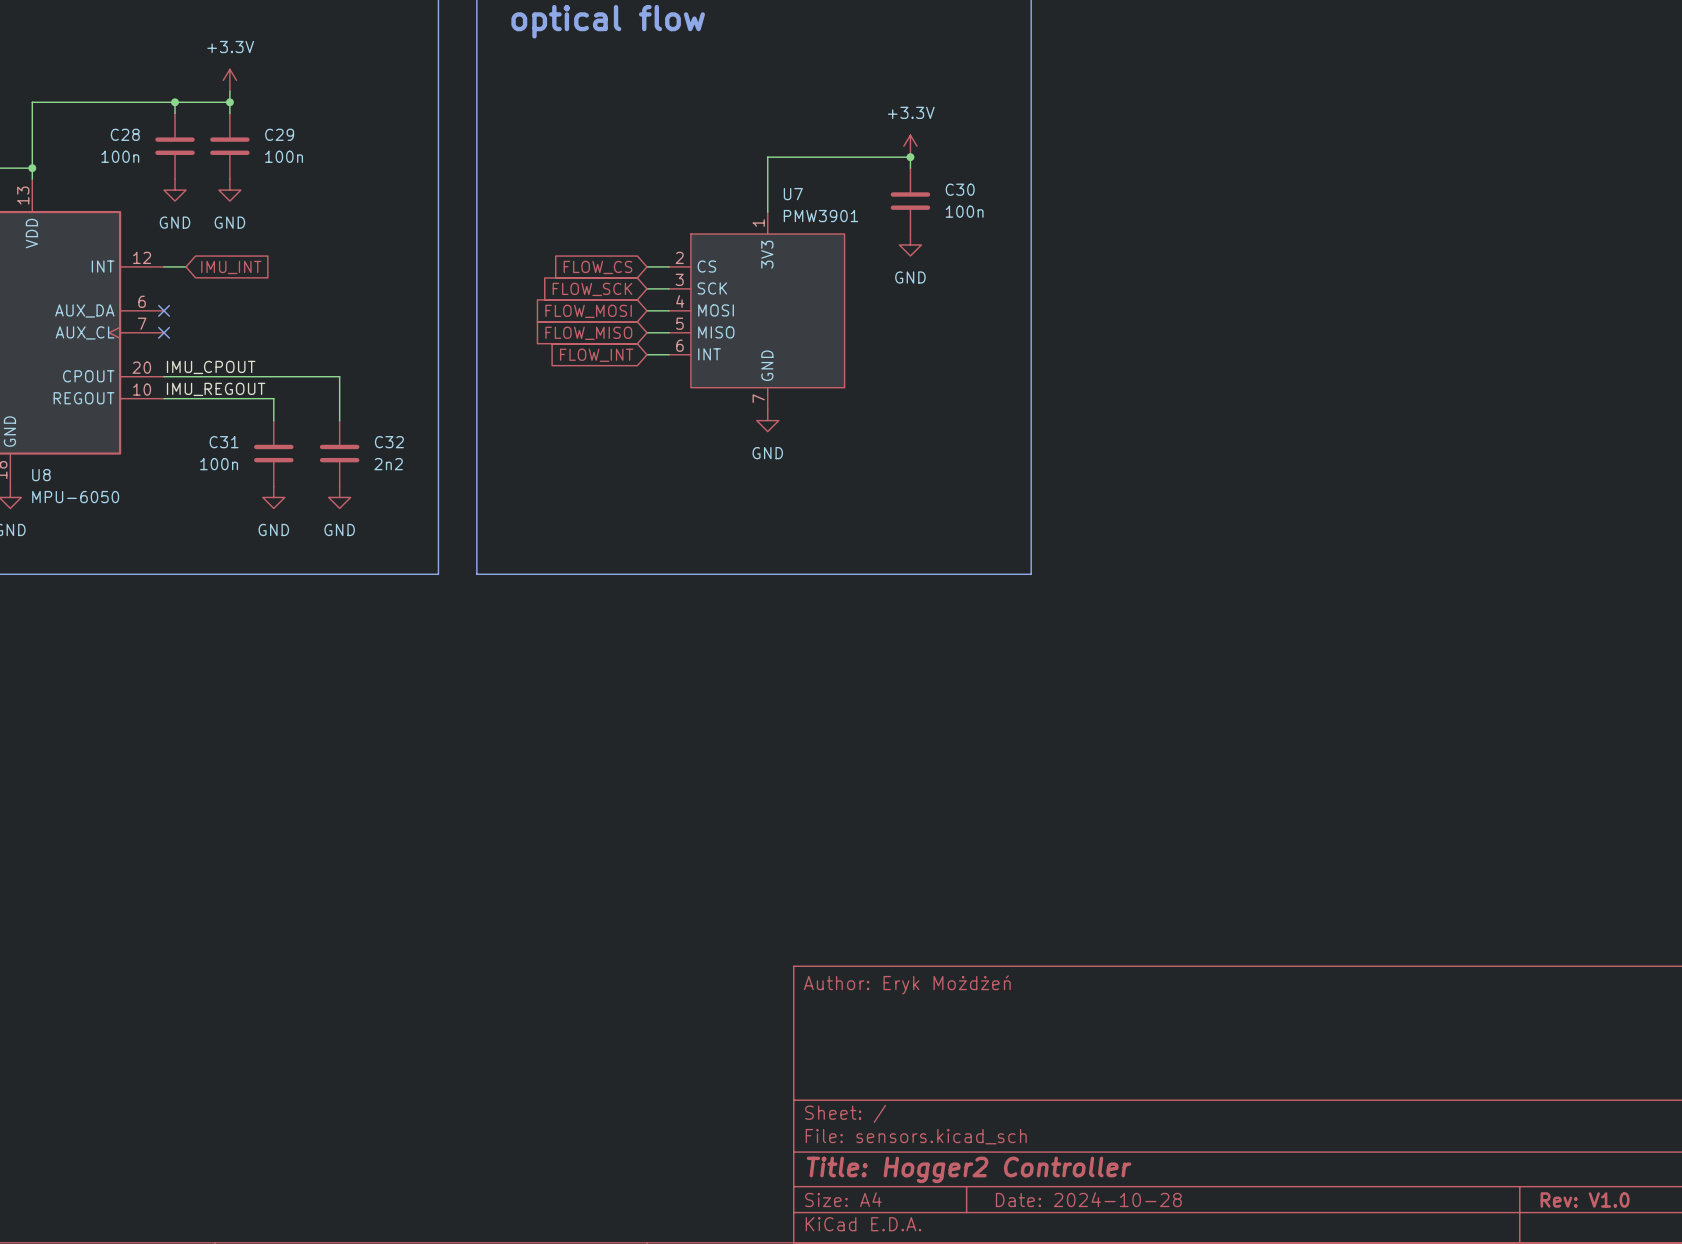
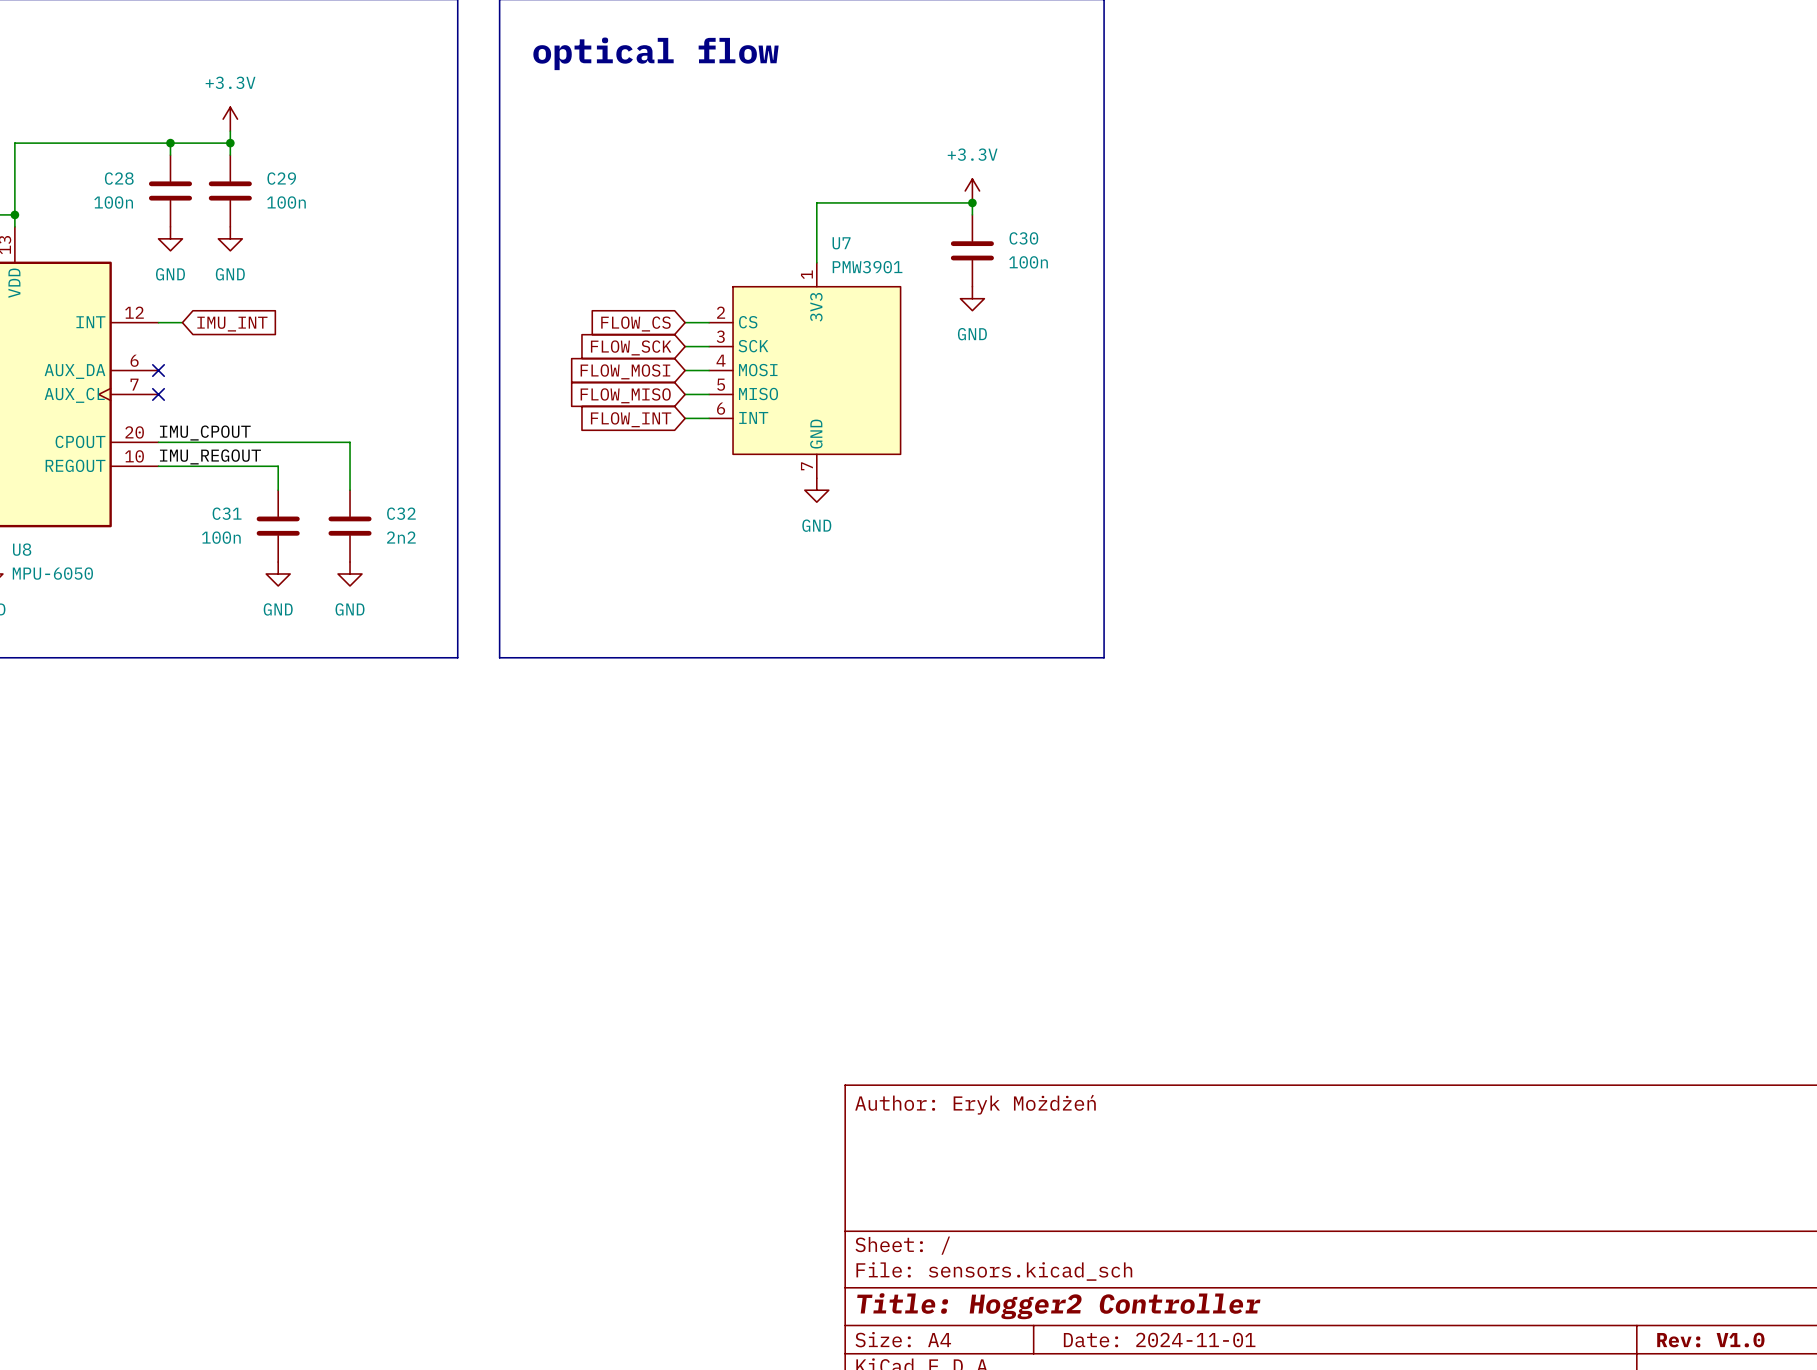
title block: Date: 2024-10-28 (1088, 1199) -> Date: 2024-11-01 (1159, 1340)

